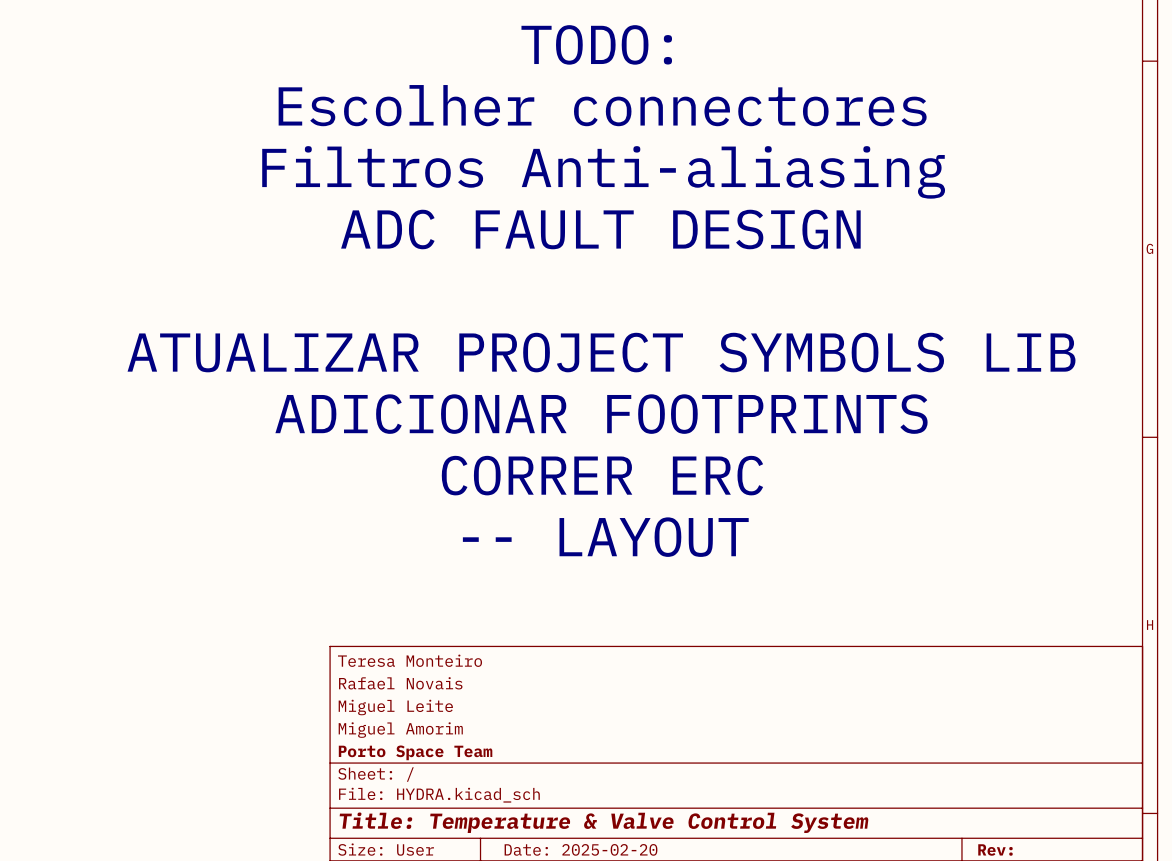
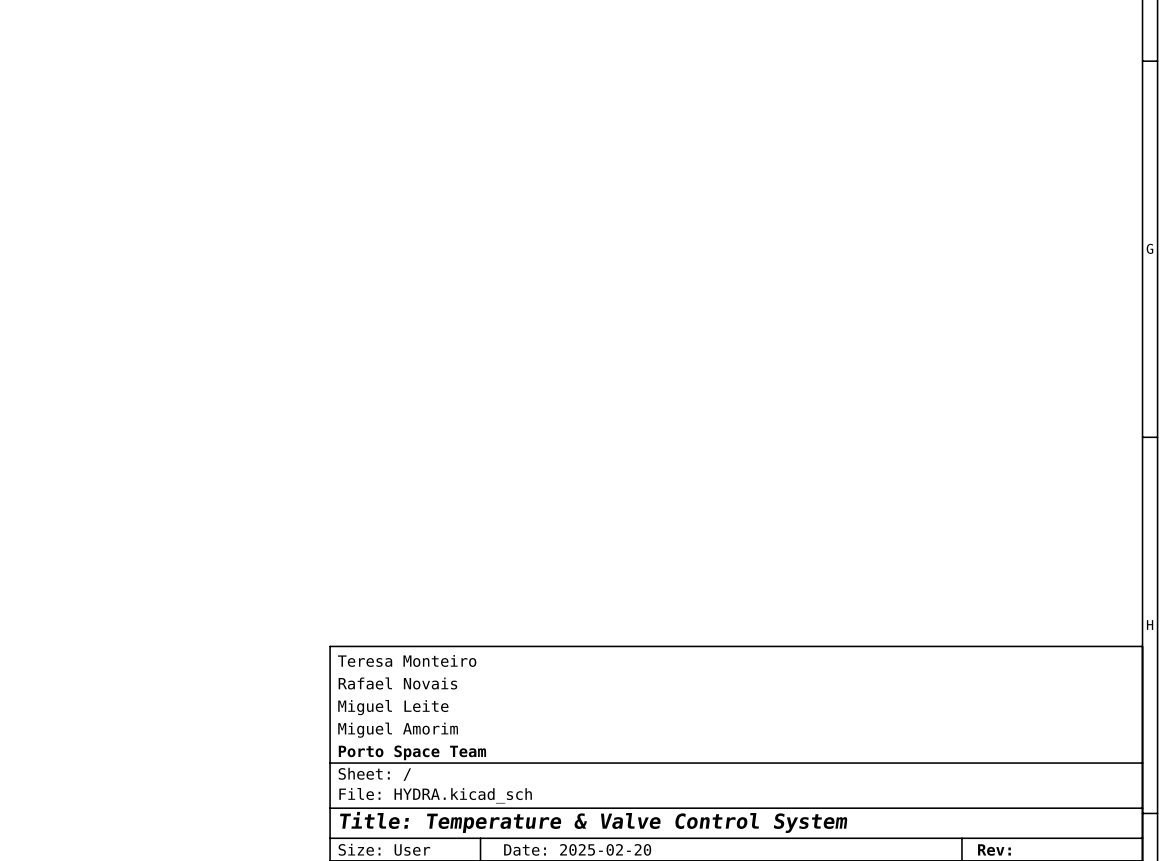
text: TODO: (596, 44) -> none
text: Escolher connectores (602, 105) -> none
text: Filtros Anti-aliasing (603, 172) -> none
text: ADC FAULT DESIGN (600, 229) -> none
text: ATUALIZAR PROJECT SYMBOLS LIB (601, 352) -> none
text: ADICIONAR FOOTPRINTS (601, 414) -> none
text: CORRER ERC (602, 475) -> none
text: -- LAYOUT (605, 537) -> none

